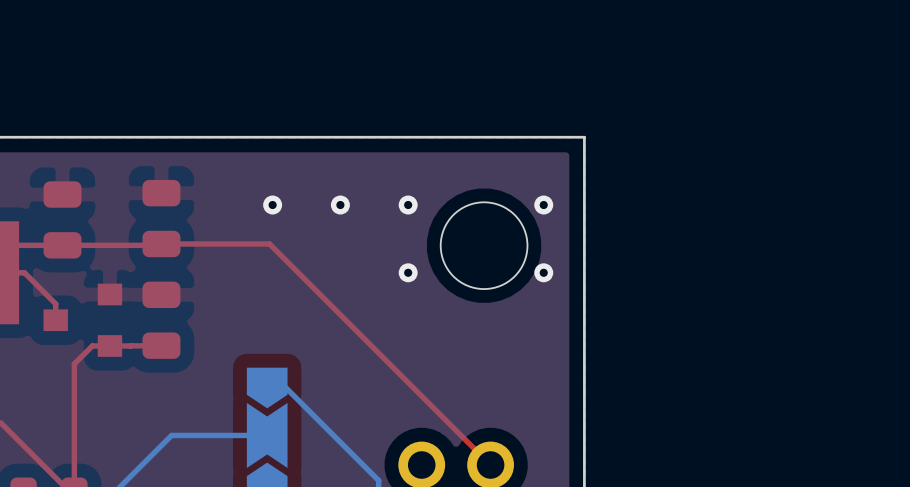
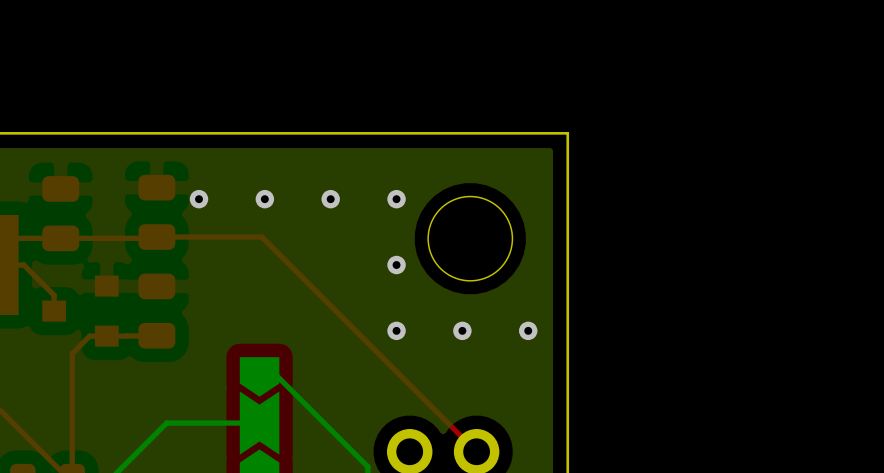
via: none -> (199, 199)
via: (543, 205) -> none
via: (543, 272) -> none
via: none -> (396, 330)
via: none -> (462, 330)
via: none -> (528, 330)

